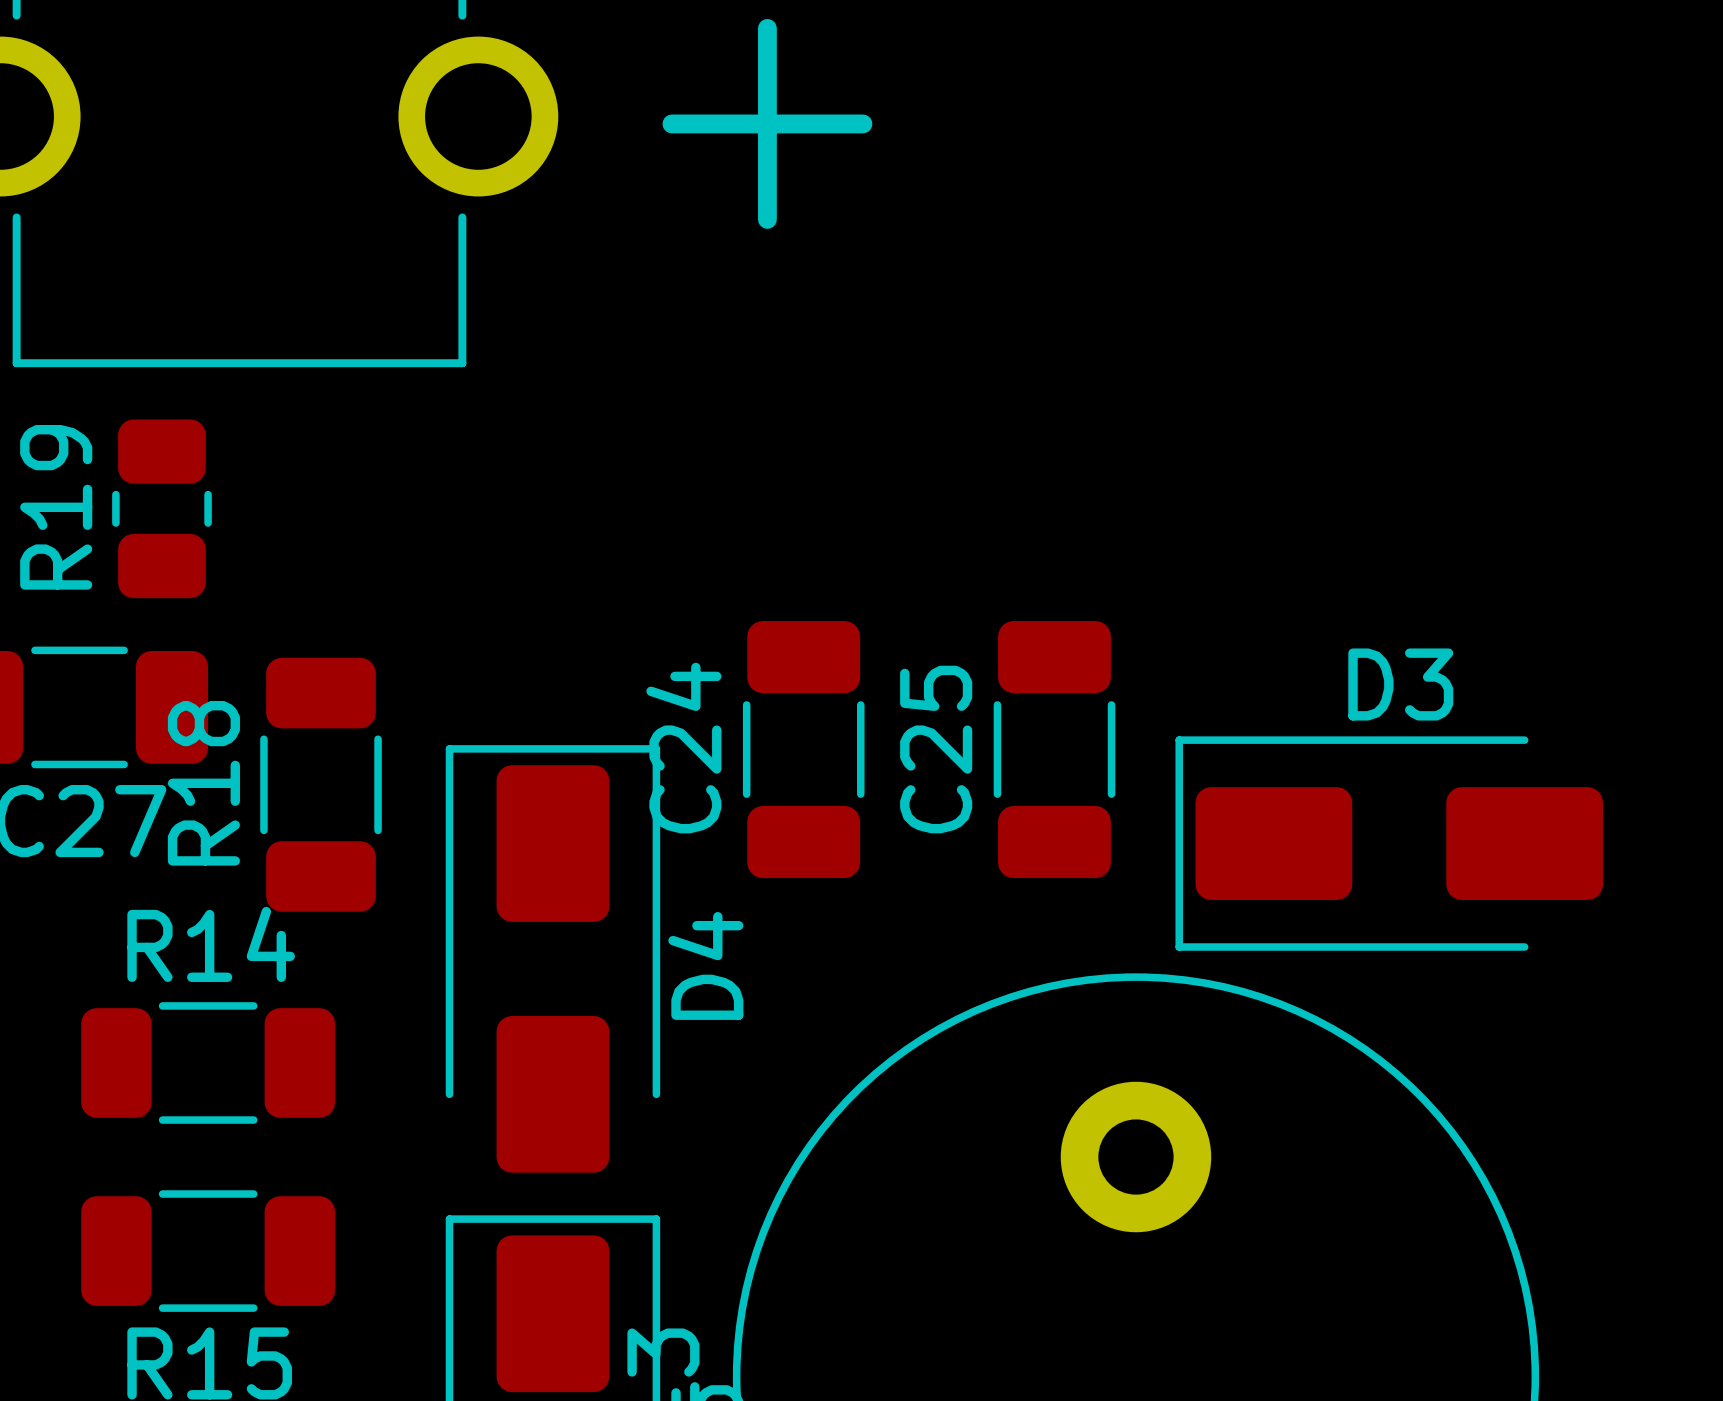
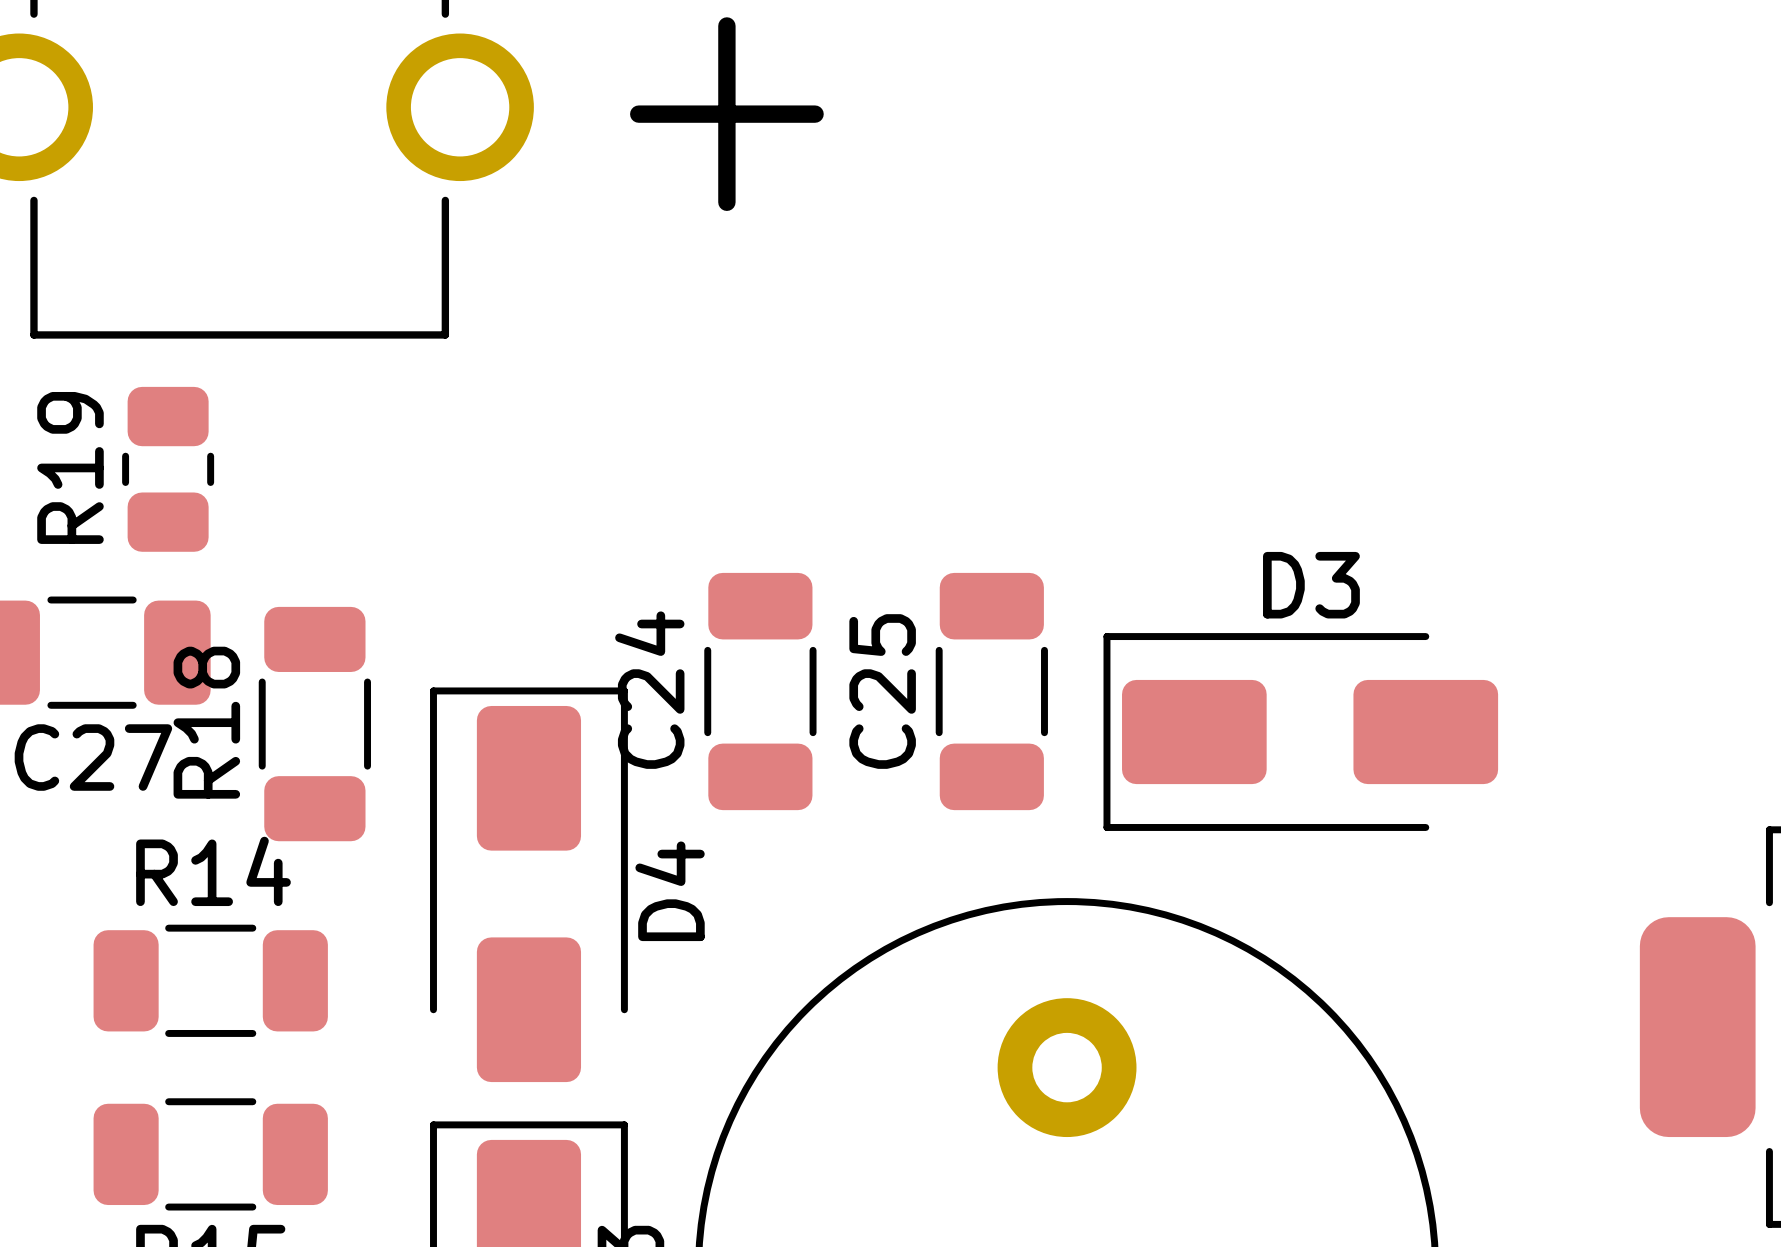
D3 position: (1389, 843) -> (1300, 732)

